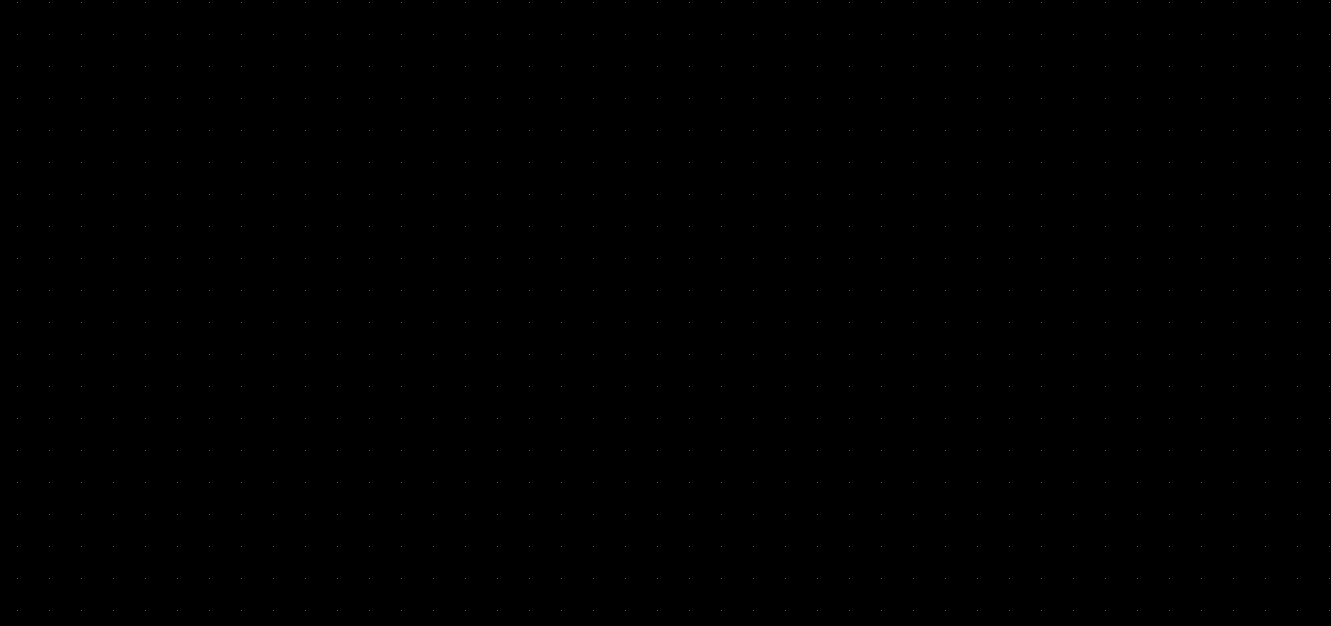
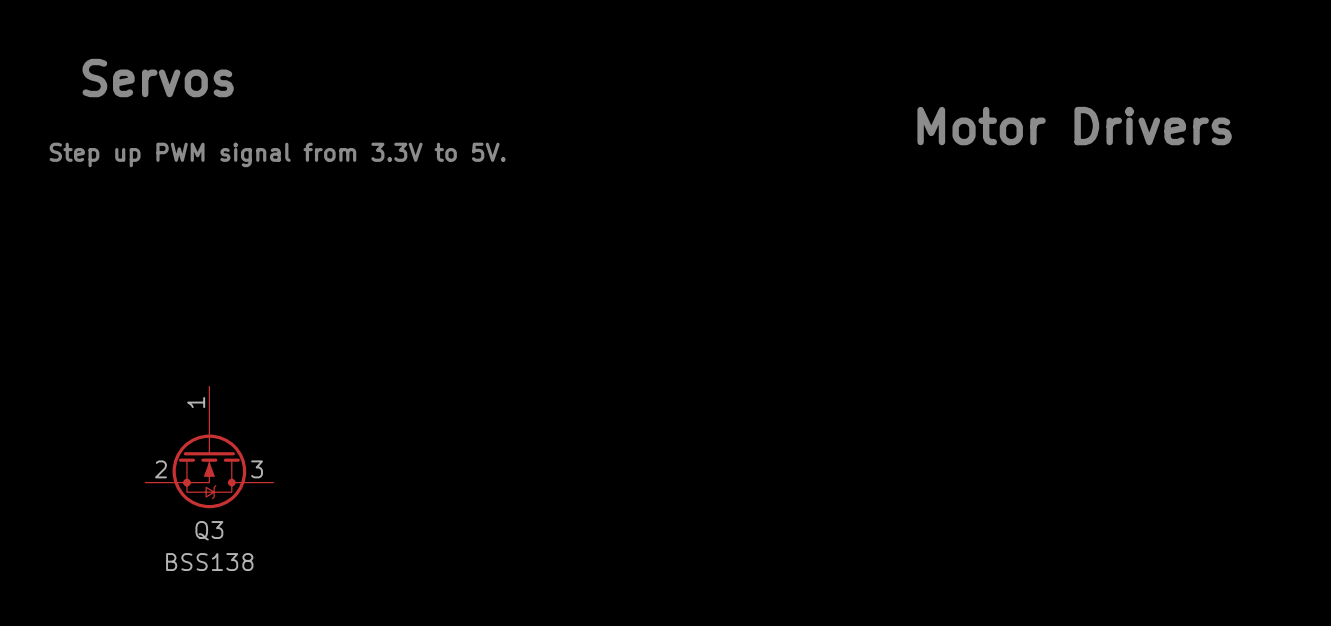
text: none -> Servos (158, 78)
text: none -> Motor Drivers (1074, 126)
text: none -> Step up PWM signal from 3.3V to 5V. (277, 154)
Q3: none -> BSS138 (209, 447)

